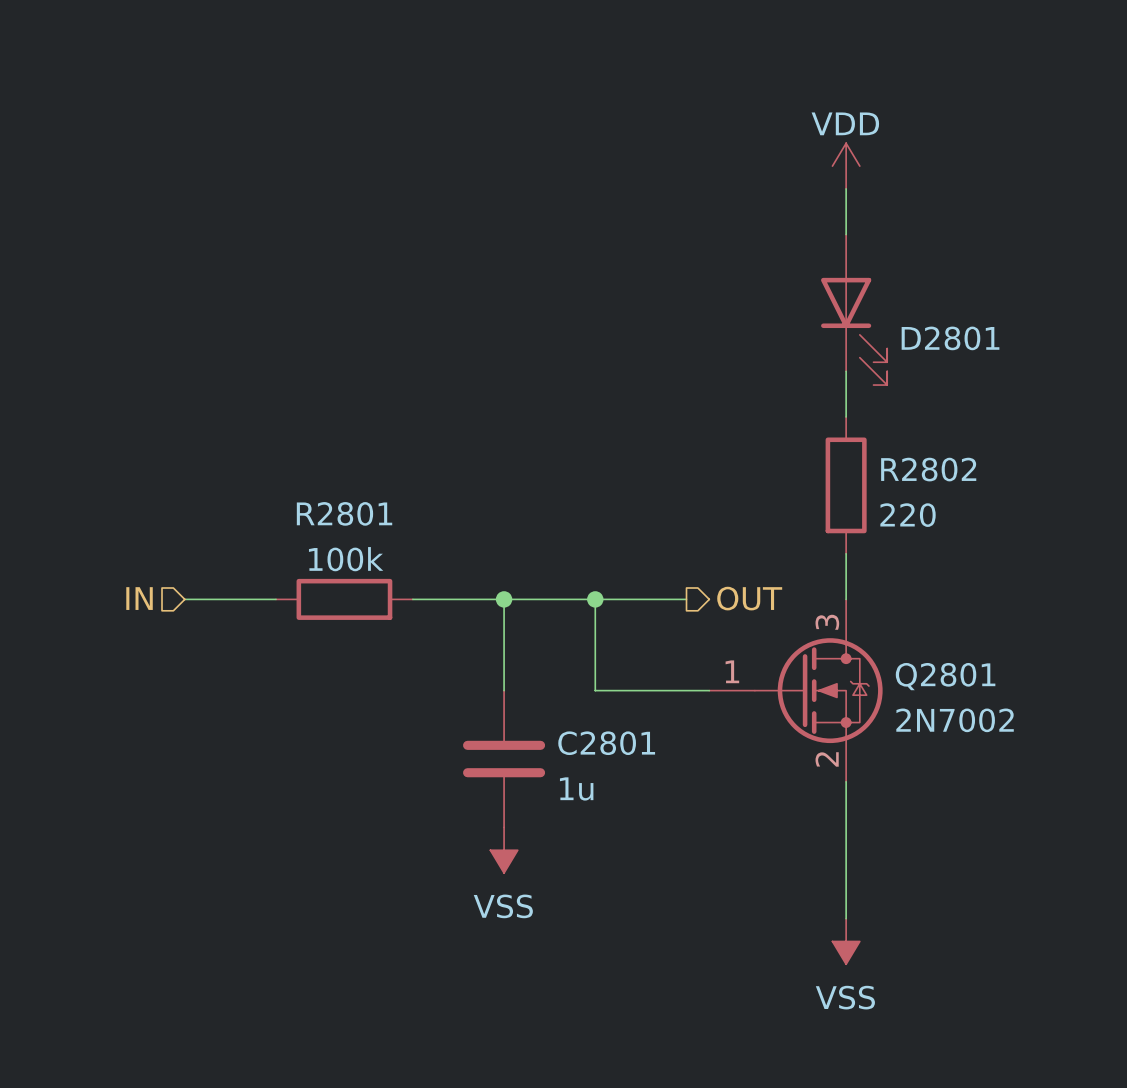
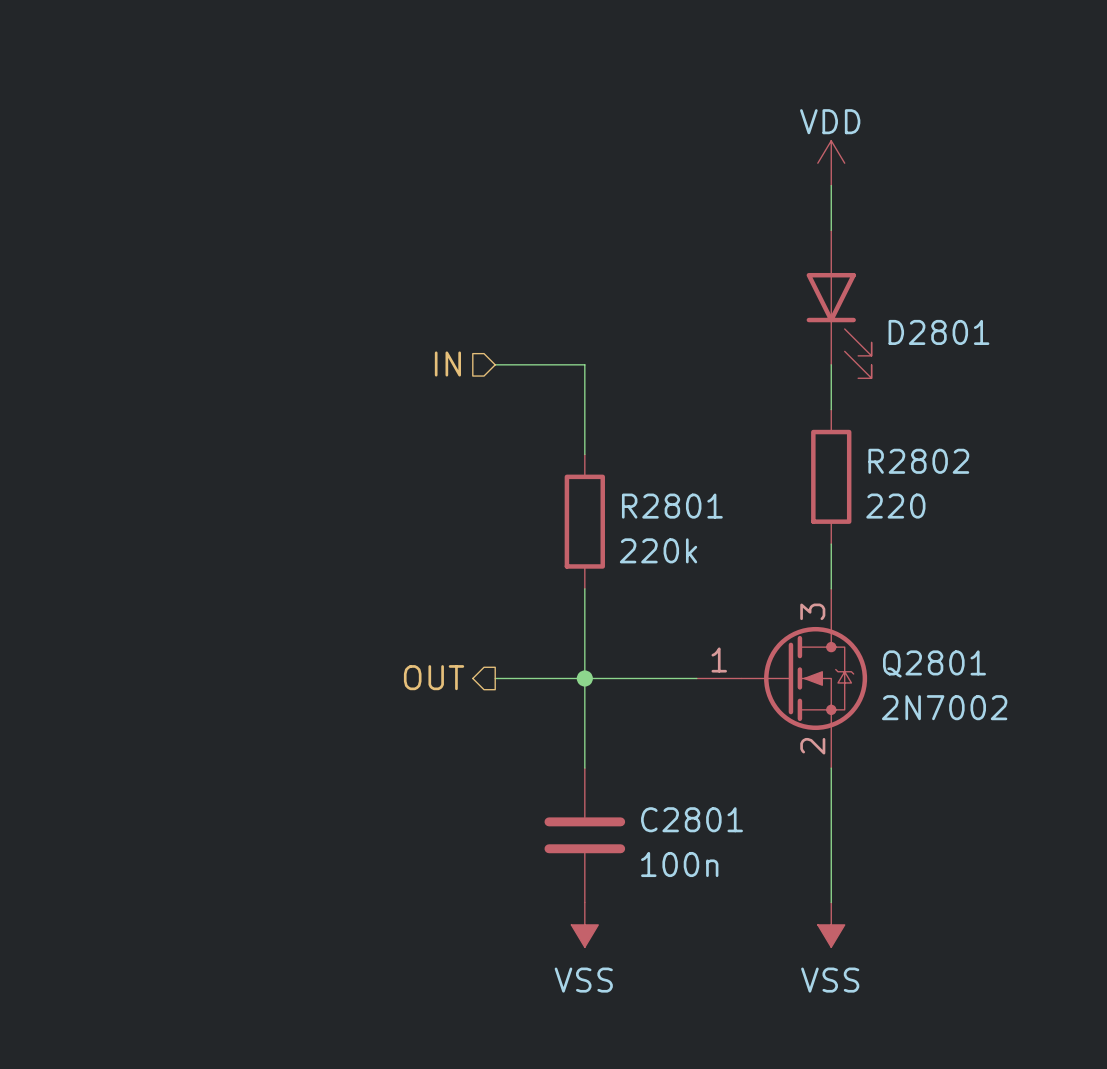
wire: none -> (495, 364) (584, 364) (584, 454)
R2801 value: 100k (346, 559) -> 220k (658, 550)
hierarchical label position: IN (139, 598) -> IN (447, 364)
hierarchical label rotation: 0° (749, 598) -> 180° (434, 677)
hierarchical label position: OUT (749, 598) -> OUT (434, 677)
wire: (184, 599) (276, 599) -> none
R2801 rotation: 0° (344, 599) -> 90° clockwise (584, 521)
R2801 position: (344, 599) -> (584, 521)
wire: (412, 599) (686, 599) -> none
wire: (504, 599) (504, 690) -> (584, 768) (584, 678) (495, 678)
junction: (504, 599) -> none
junction: (595, 599) -> none
junction: none -> (584, 678)
C2801 position: (504, 759) -> (584, 835)
C2801 value: 1u (576, 788) -> 100n (679, 864)
power symbol position: VSS (504, 850) -> VSS (584, 924)

